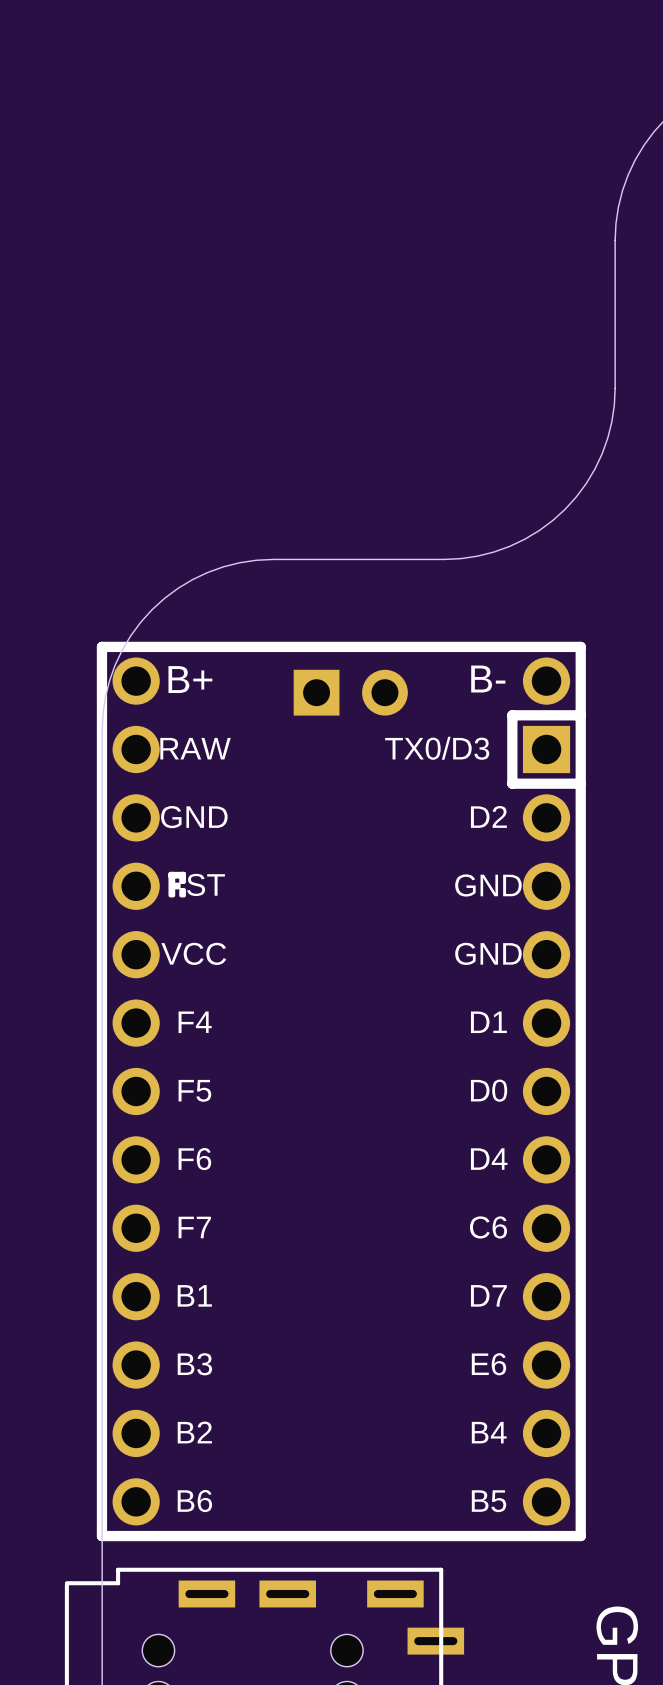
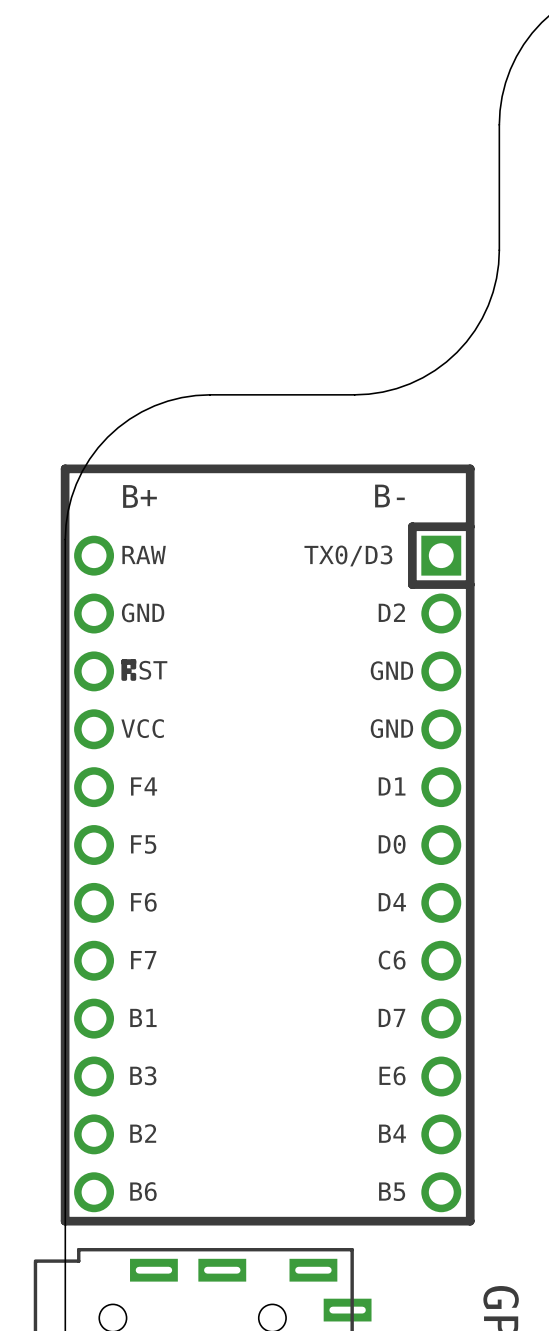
part footprint: [96, 641, 586, 1542] -> [60, 464, 475, 1226]
part: (350, 692) -> none

